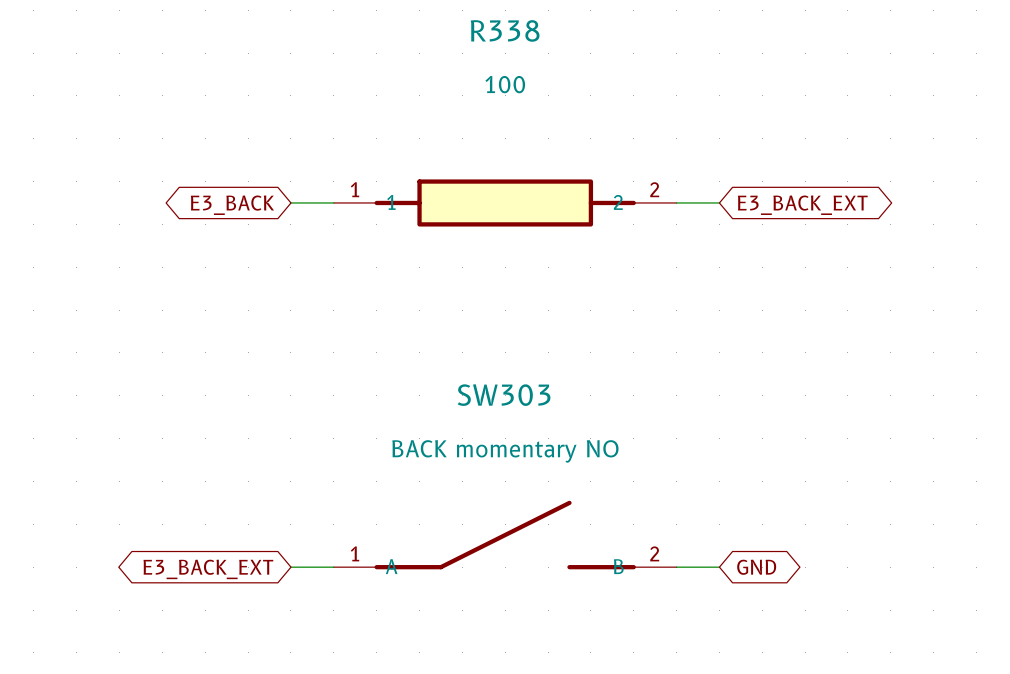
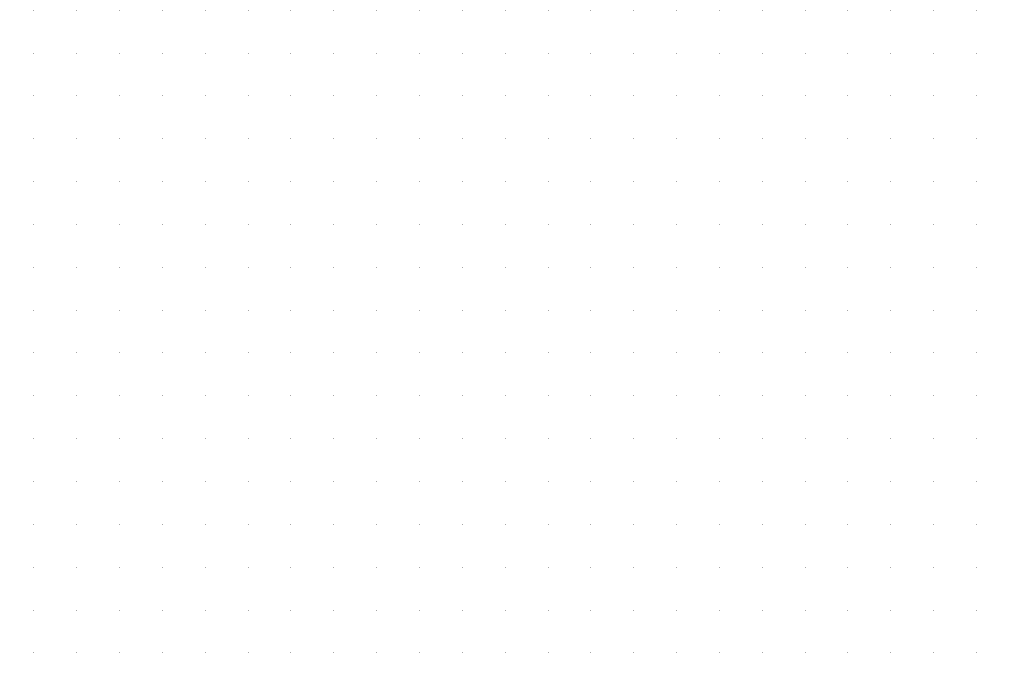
wire: (290, 202) (333, 202) -> none
R338: 100 (505, 202) -> none
wire: (676, 202) (719, 202) -> none
global label: E3_BACK (232, 205) -> none
global label: E3_BACK_EXT (802, 205) -> none
SW303: BACK momentary NO (505, 535) -> none
wire: (290, 567) (333, 567) -> none
wire: (676, 567) (719, 567) -> none
global label: GND (756, 567) -> none
global label: E3_BACK_EXT (208, 569) -> none

